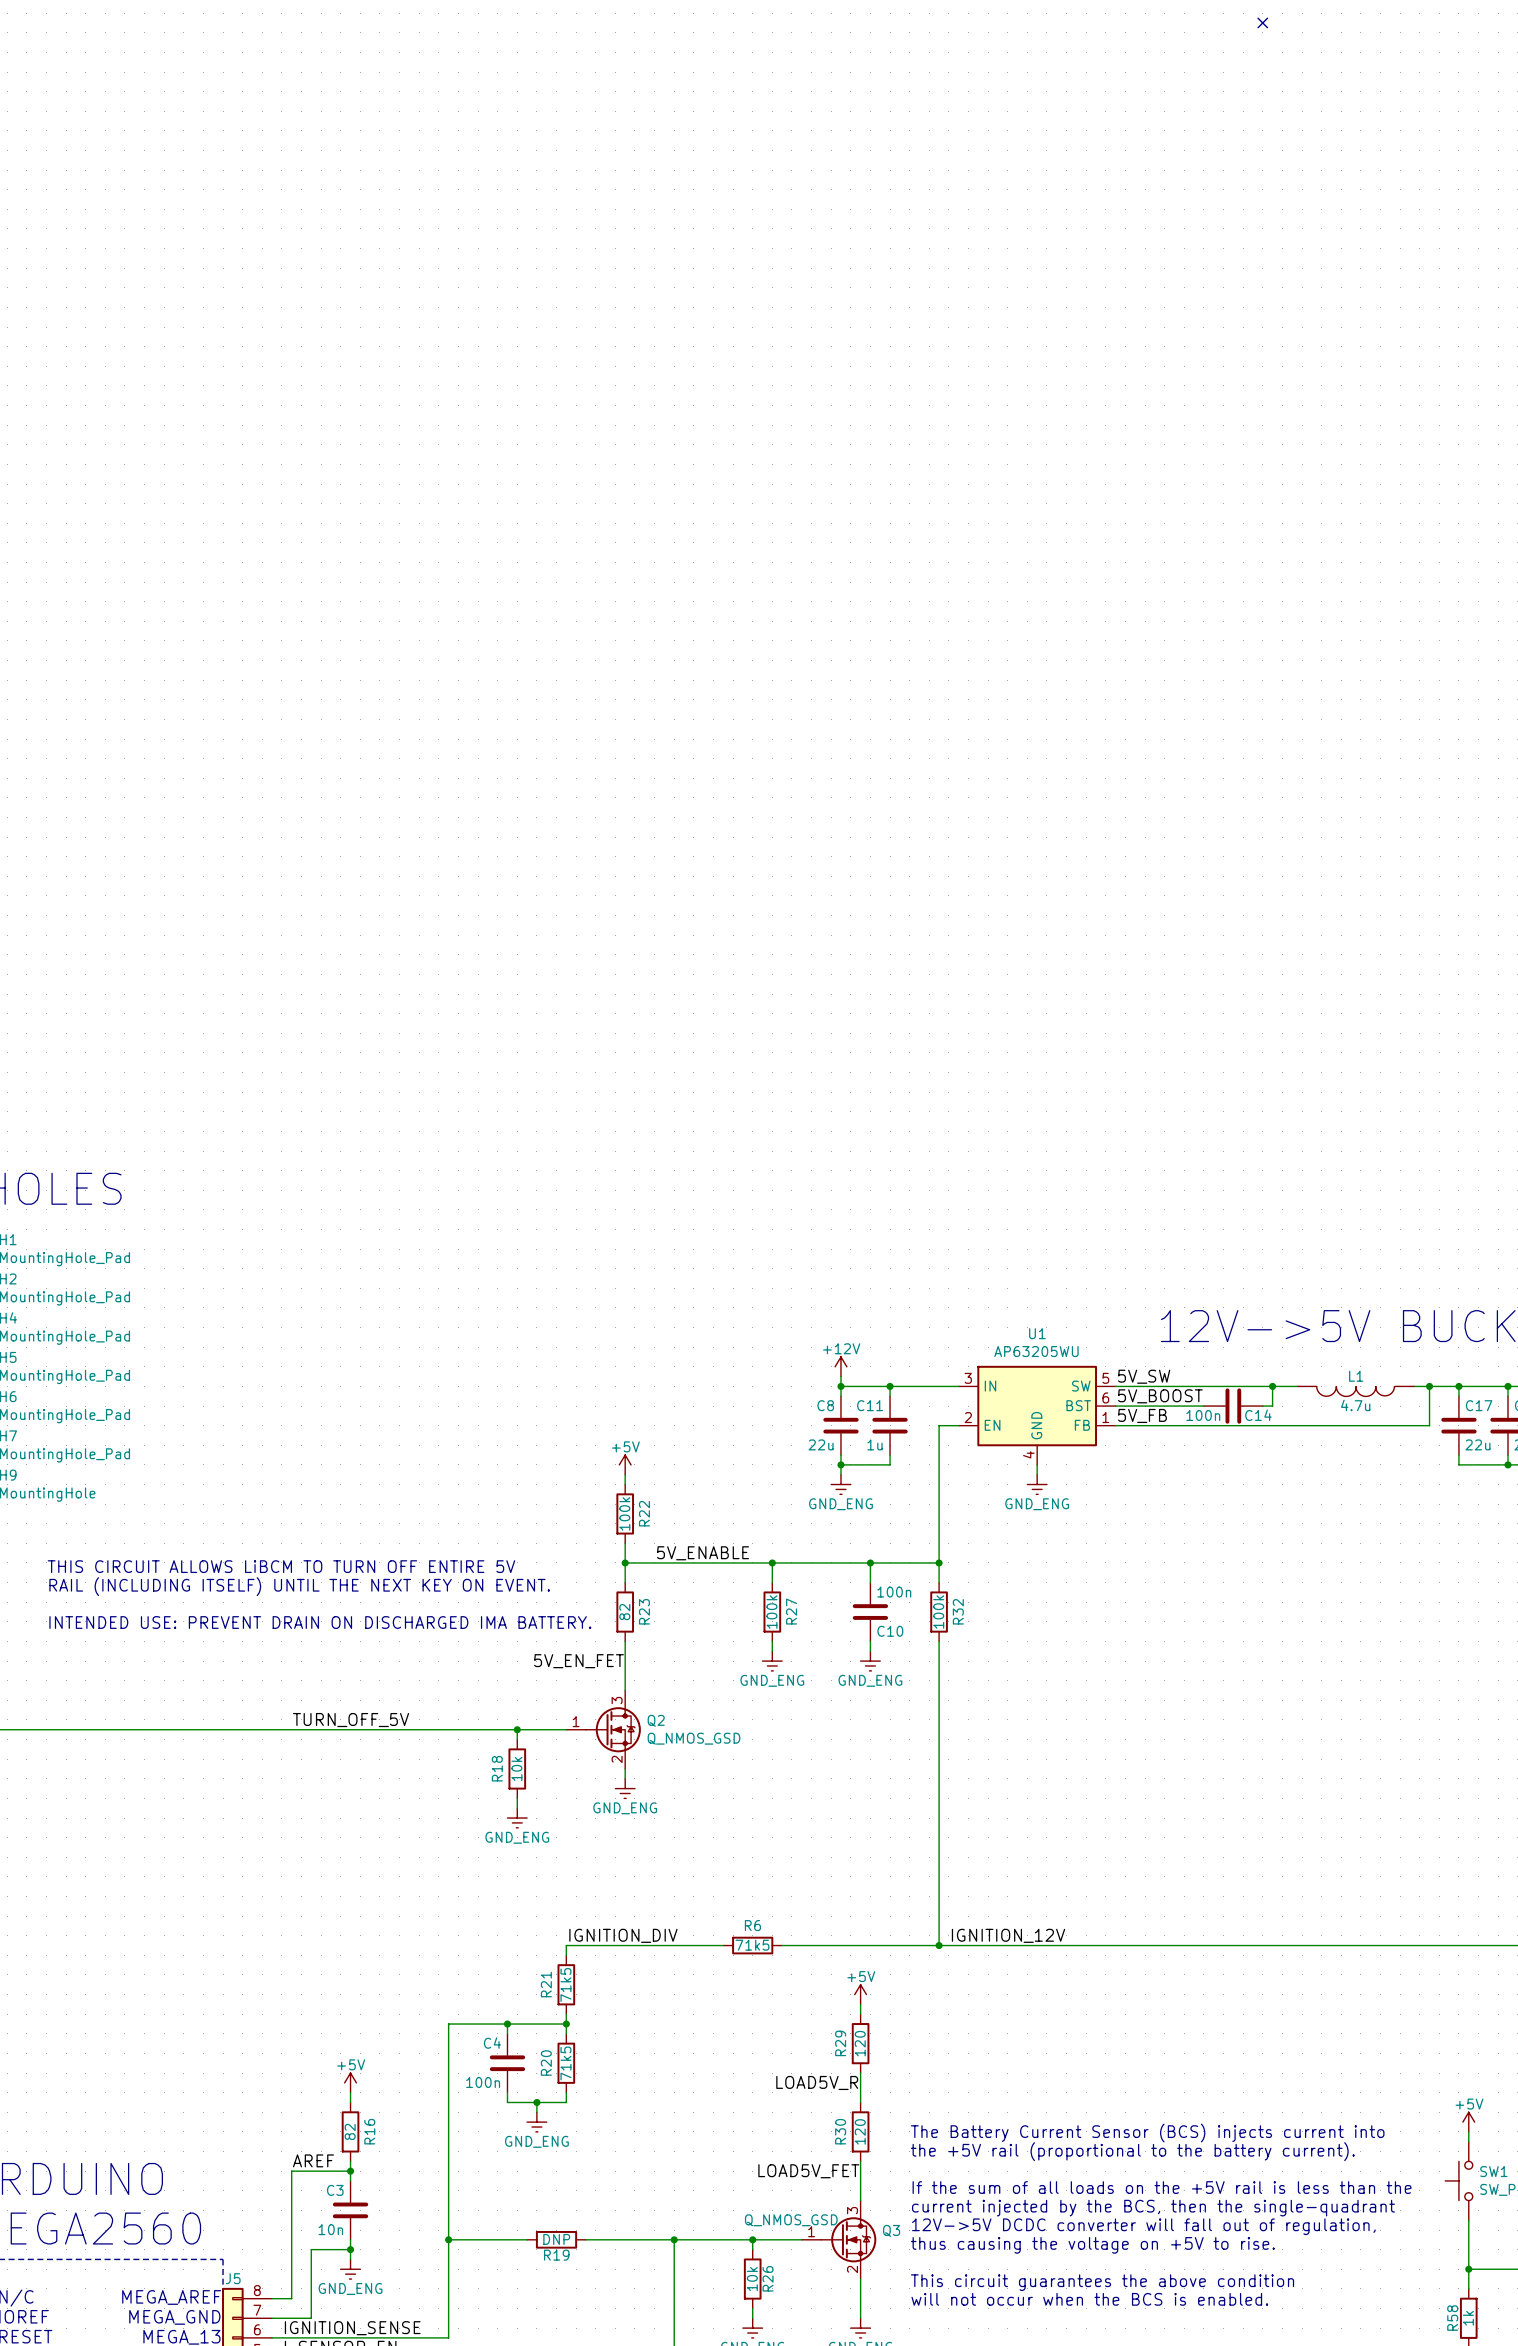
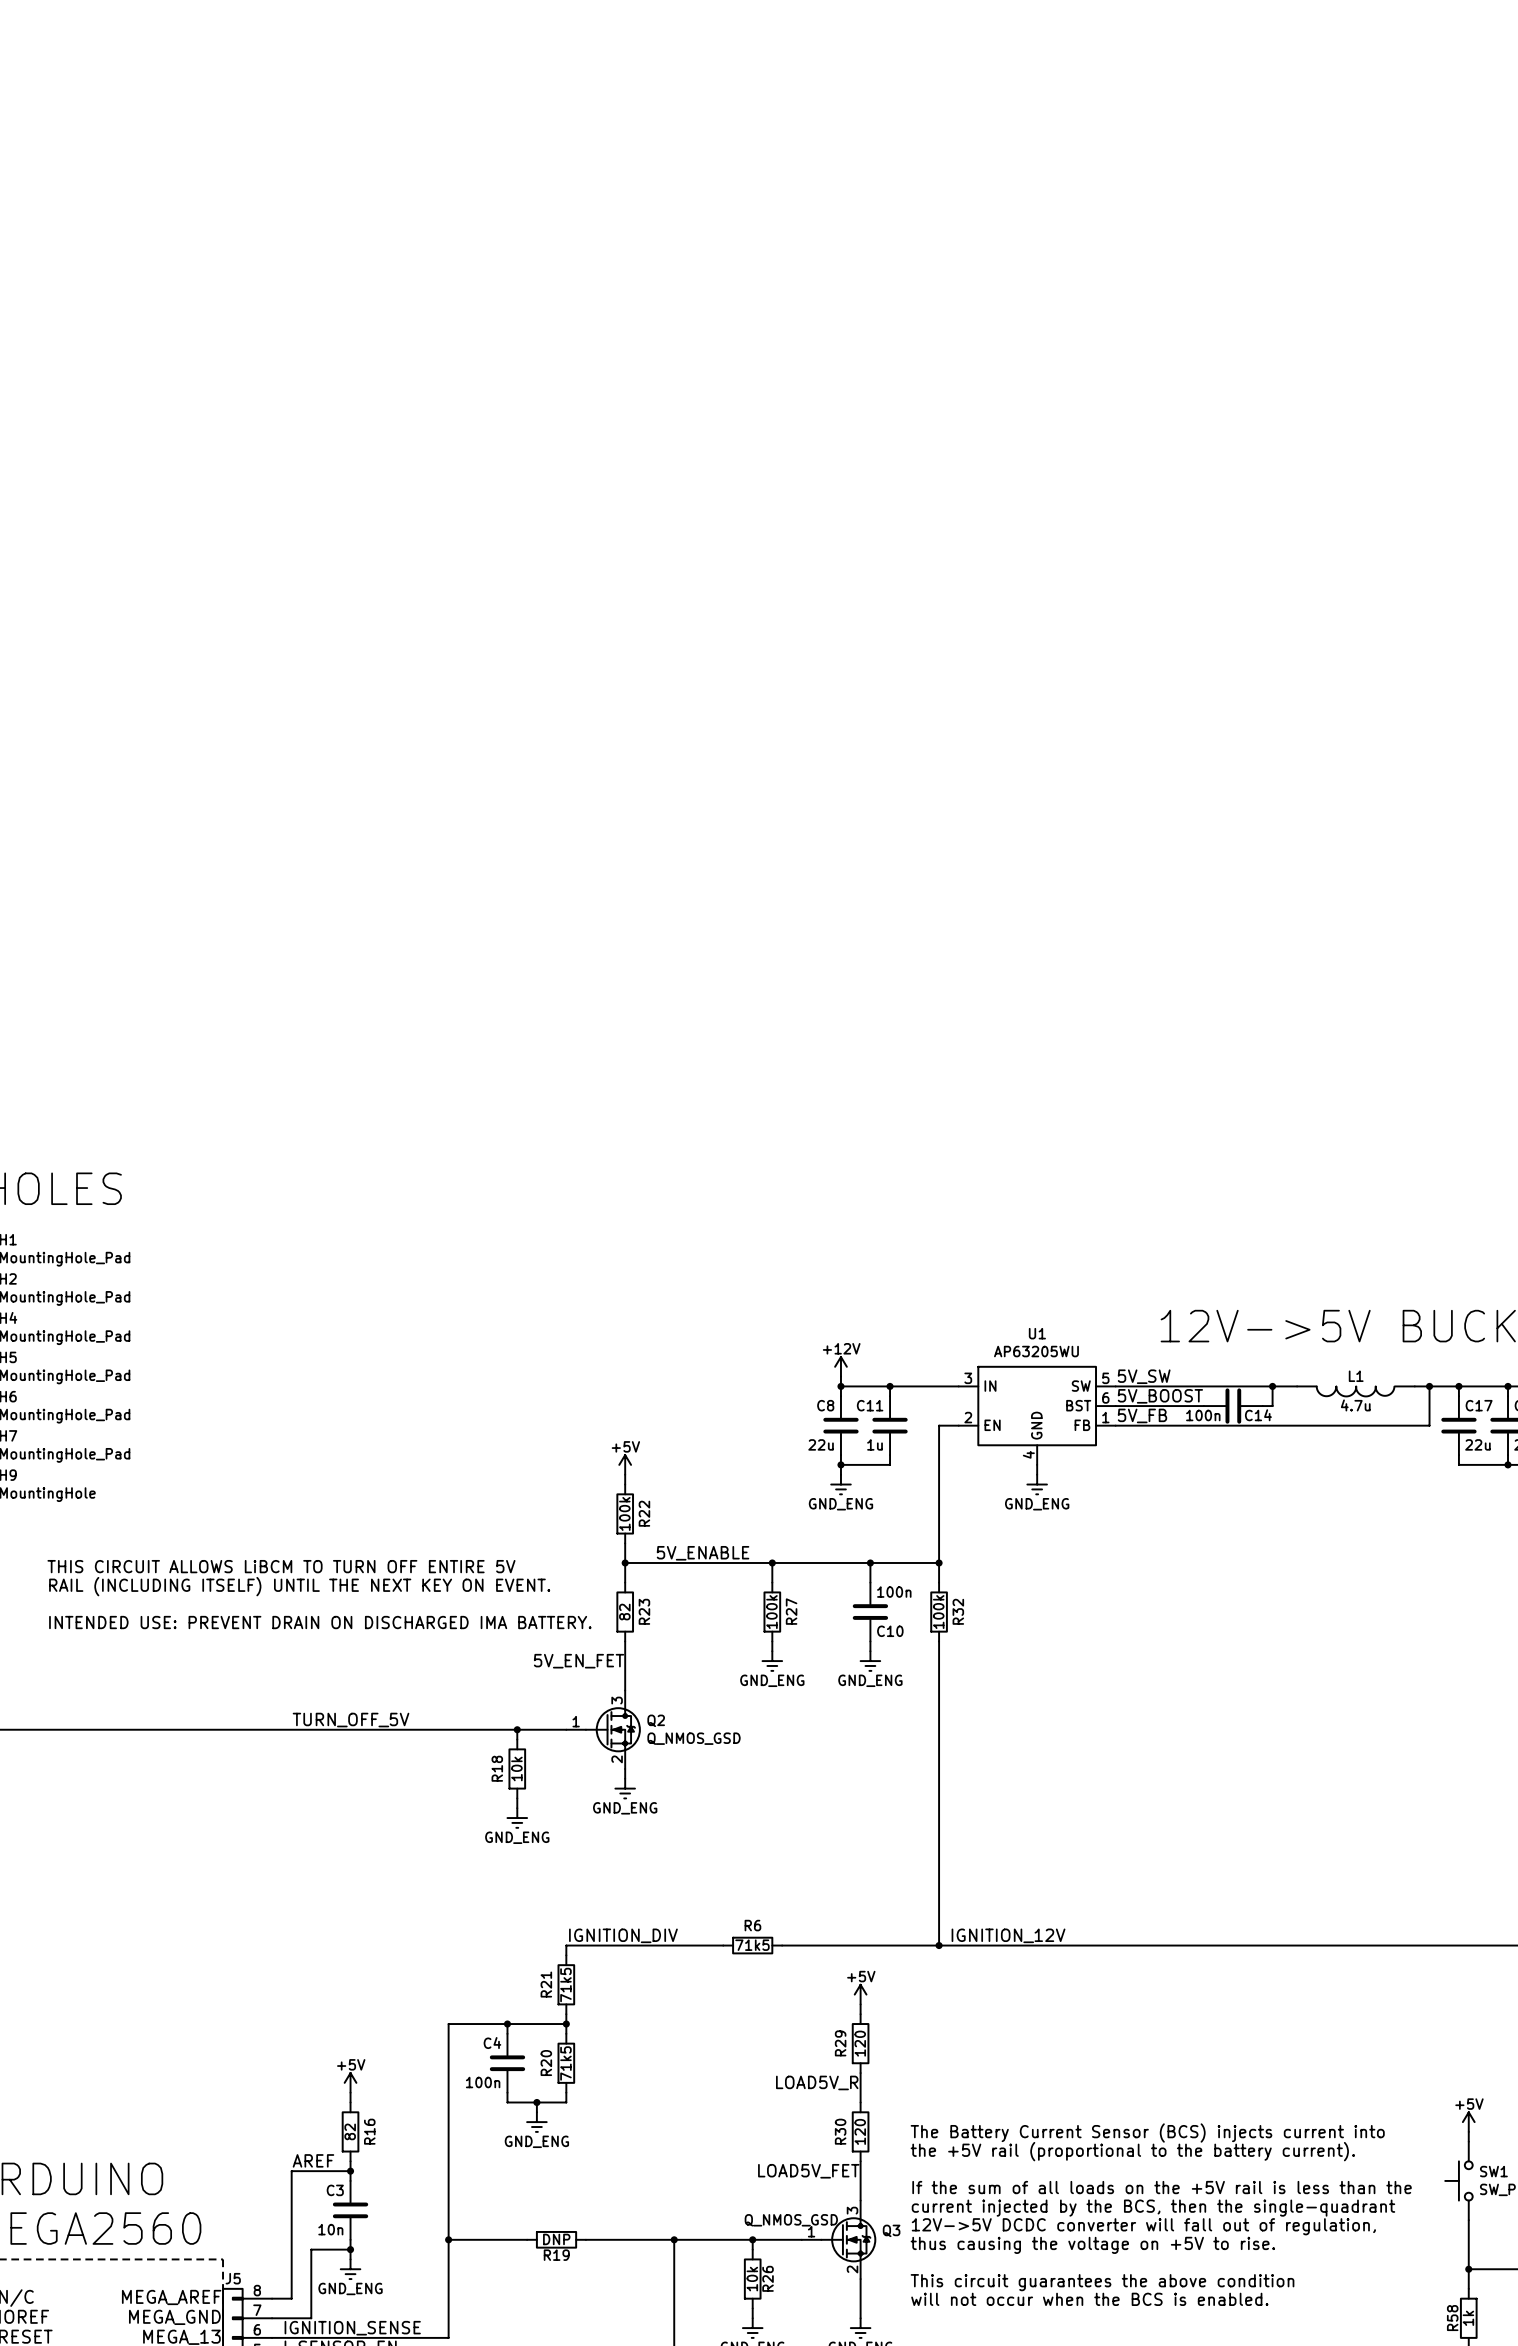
no-connect mark: (1262, 22) -> none

